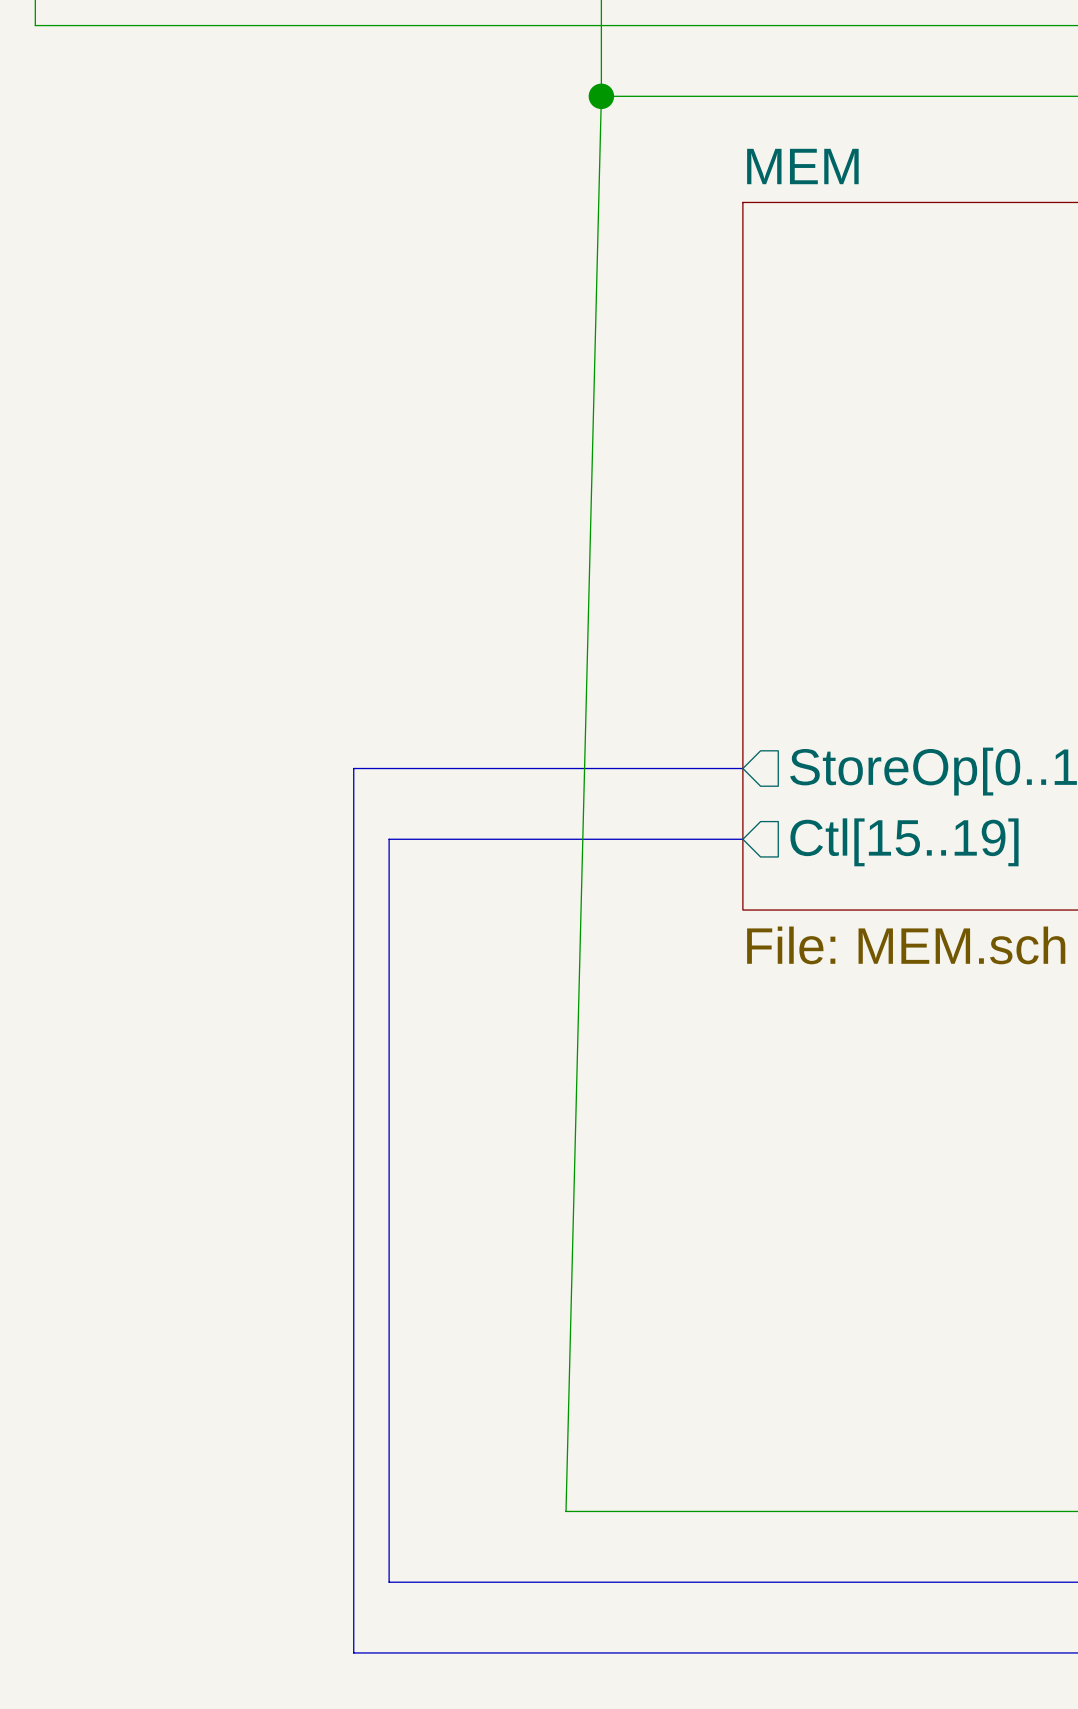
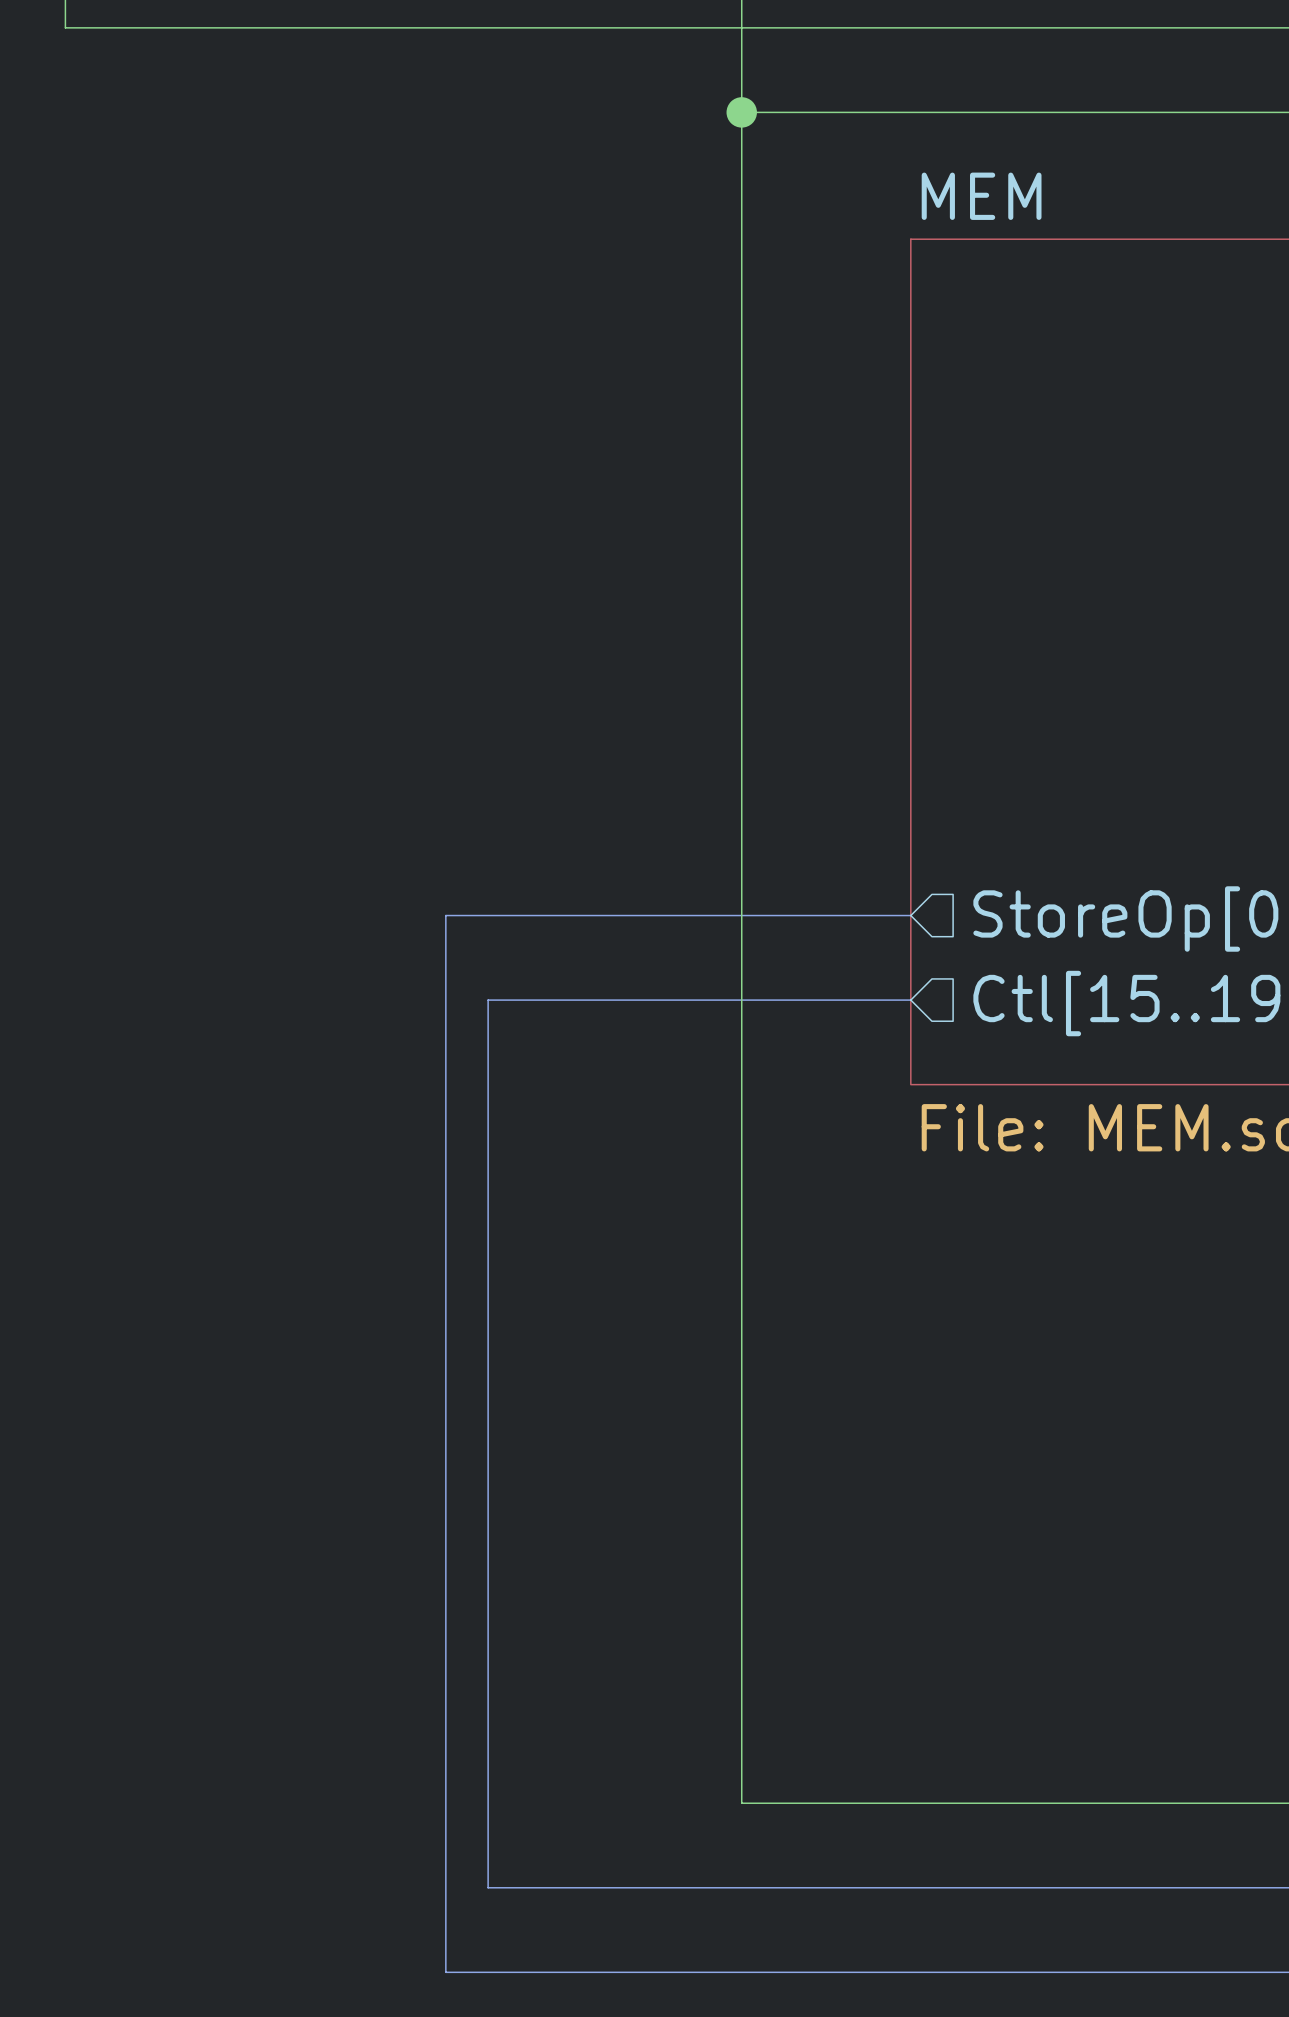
wire: (601, 96) (566, 1511) (601, 1511) -> (741, 112) (741, 1803)

